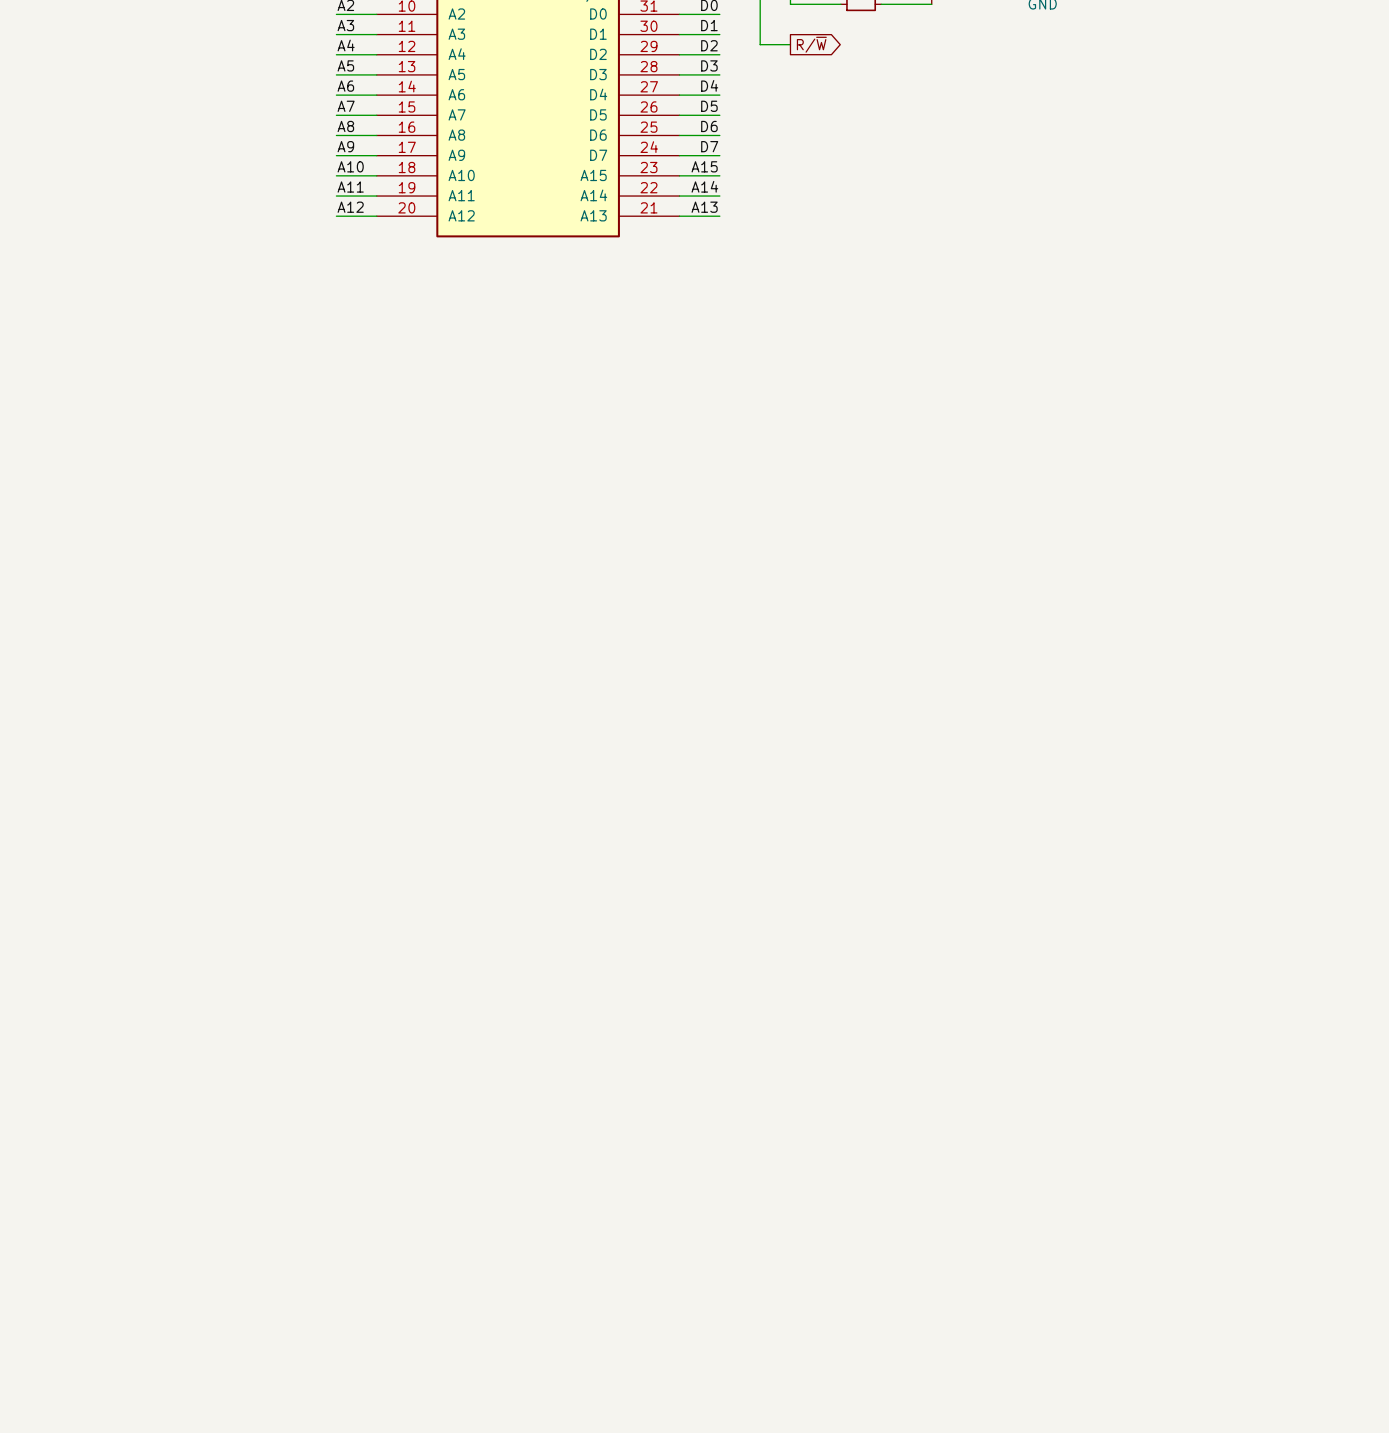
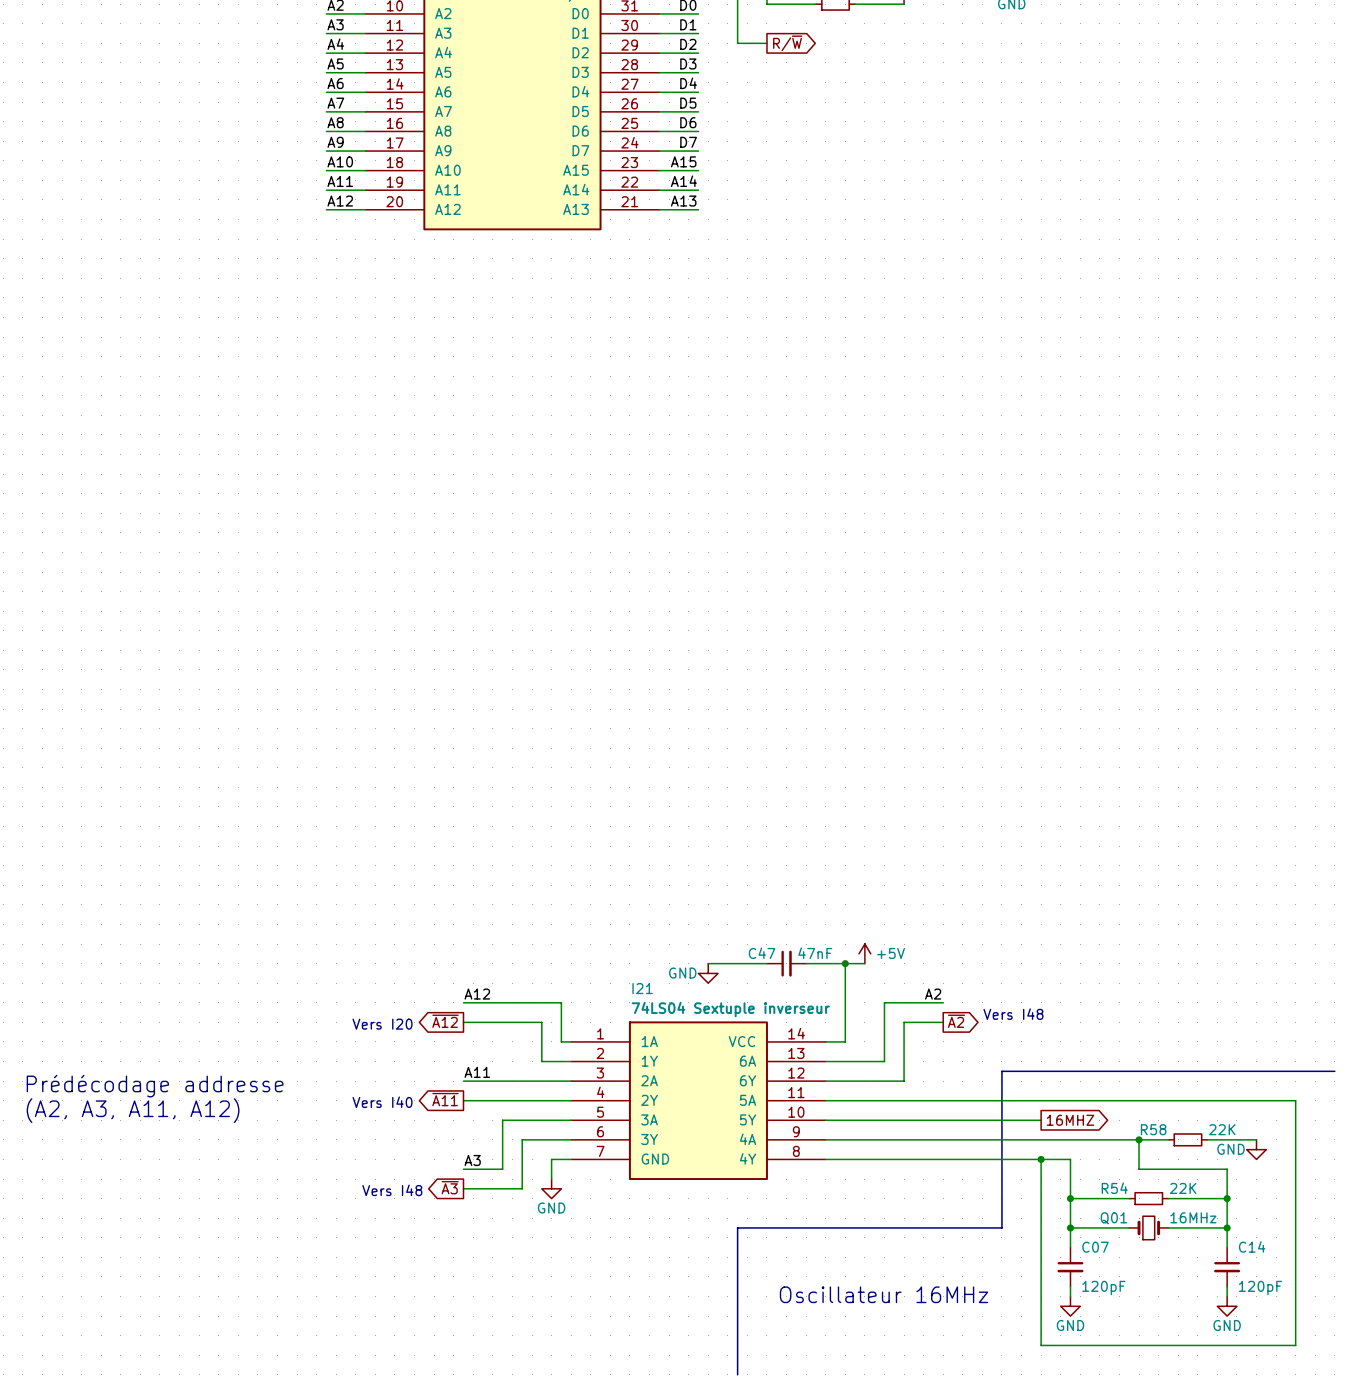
power symbol: none -> +5V (864, 953)
wire: none -> (708, 963) (766, 963)
C47: none -> 47nF (786, 963)
wire: none -> (806, 963) (864, 963)
wire: none -> (845, 963) (845, 1041) (825, 1041)
junction: none -> (845, 963)
power symbol: none -> GND (708, 973)
label: none -> A12 (477, 994)
label: none -> A2 (933, 994)
wire: none -> (463, 1002) (561, 1002) (561, 1041) (571, 1041)
wire: none -> (943, 1002) (884, 1002) (884, 1061) (825, 1061)
text: none -> Vers I48 (1013, 1014)
global label: none -> ~{A12} (445, 1021)
global label: none -> ~{A2} (956, 1021)
wire: none -> (463, 1022) (541, 1022) (541, 1061) (571, 1061)
wire: none -> (943, 1022) (904, 1022) (904, 1081) (825, 1081)
text: none -> Vers I20 (382, 1024)
line: none -> (1334, 1071) (1001, 1071) (1001, 1227) (737, 1227) (737, 1374)
label: none -> A11 (477, 1072)
wire: none -> (463, 1081) (571, 1081)
text: none -> Prédécodage addresse (155, 1086)
global label: none -> ~{A11} (445, 1099)
wire: none -> (463, 1100) (571, 1100)
I21: none -> 74LS04 Sextuple inverseur (698, 1100)
wire: none -> (825, 1100) (1295, 1100) (1295, 1345) (1041, 1345) (1041, 1159)
text: none -> Vers I40 (382, 1102)
text: none -> (A2, A3, A11, A12) (133, 1110)
wire: none -> (571, 1120) (502, 1120) (502, 1169) (463, 1169)
wire: none -> (825, 1120) (1041, 1120)
global label: none -> 16MHZ (1070, 1120)
wire: none -> (571, 1139) (522, 1139) (522, 1188) (463, 1188)
wire: none -> (825, 1139) (1168, 1139)
wire: none -> (1139, 1139) (1139, 1169) (1227, 1169) (1227, 1247)
junction: none -> (1139, 1139)
R58: none -> 22K (1187, 1139)
wire: none -> (1207, 1139) (1256, 1139)
power symbol: none -> GND (1256, 1149)
wire: none -> (571, 1159) (551, 1159) (551, 1179)
wire: none -> (825, 1159) (1070, 1159) (1070, 1247)
junction: none -> (1041, 1159)
label: none -> A3 (472, 1160)
global label: none -> ~{A3} (450, 1187)
power symbol: none -> GND (551, 1188)
text: none -> Vers I48 (392, 1190)
wire: none -> (1070, 1198) (1129, 1198)
junction: none -> (1070, 1198)
R54: none -> 22K (1148, 1198)
wire: none -> (1168, 1198) (1227, 1198)
junction: none -> (1227, 1198)
wire: none -> (1070, 1227) (1129, 1227)
junction: none -> (1070, 1227)
Q01: none -> 16MHz (1148, 1227)
wire: none -> (1168, 1227) (1227, 1227)
junction: none -> (1227, 1227)
C07: none -> 120pF (1070, 1267)
C14: none -> 120pF (1227, 1267)
wire: none -> (1070, 1286) (1070, 1296)
wire: none -> (1227, 1286) (1227, 1296)
text: none -> Oscillateur 16MHz (884, 1294)
power symbol: none -> GND (1070, 1306)
power symbol: none -> GND (1227, 1306)

